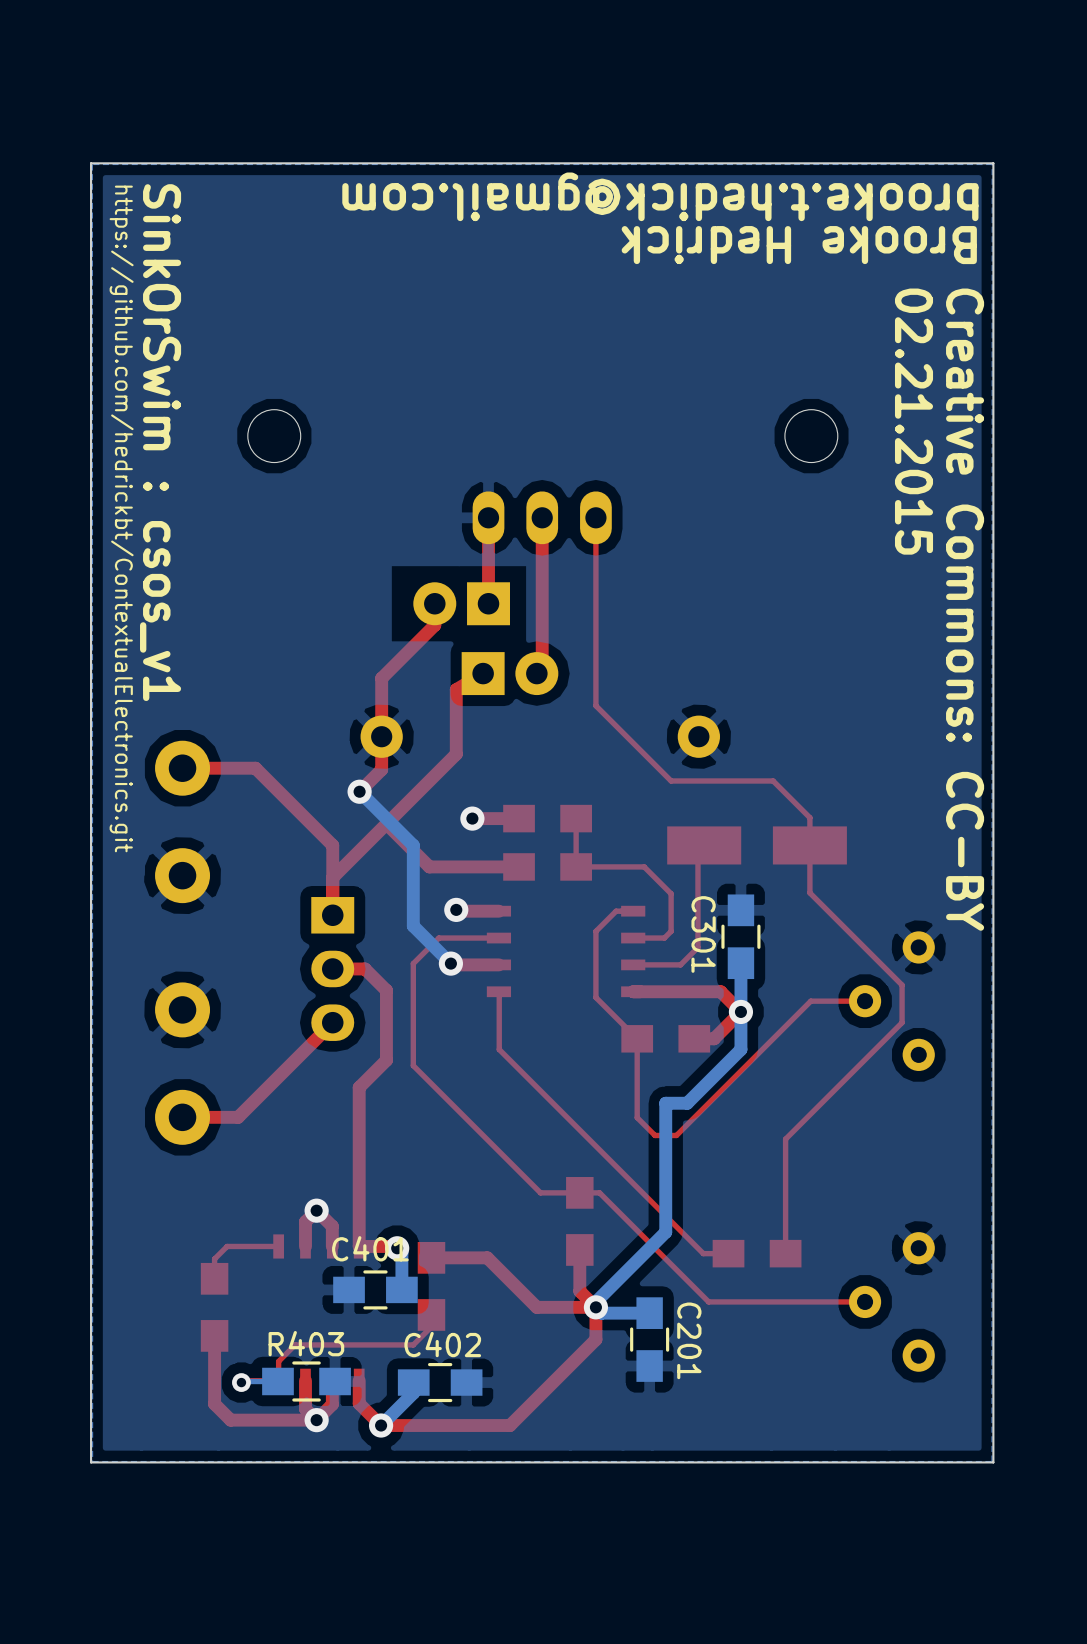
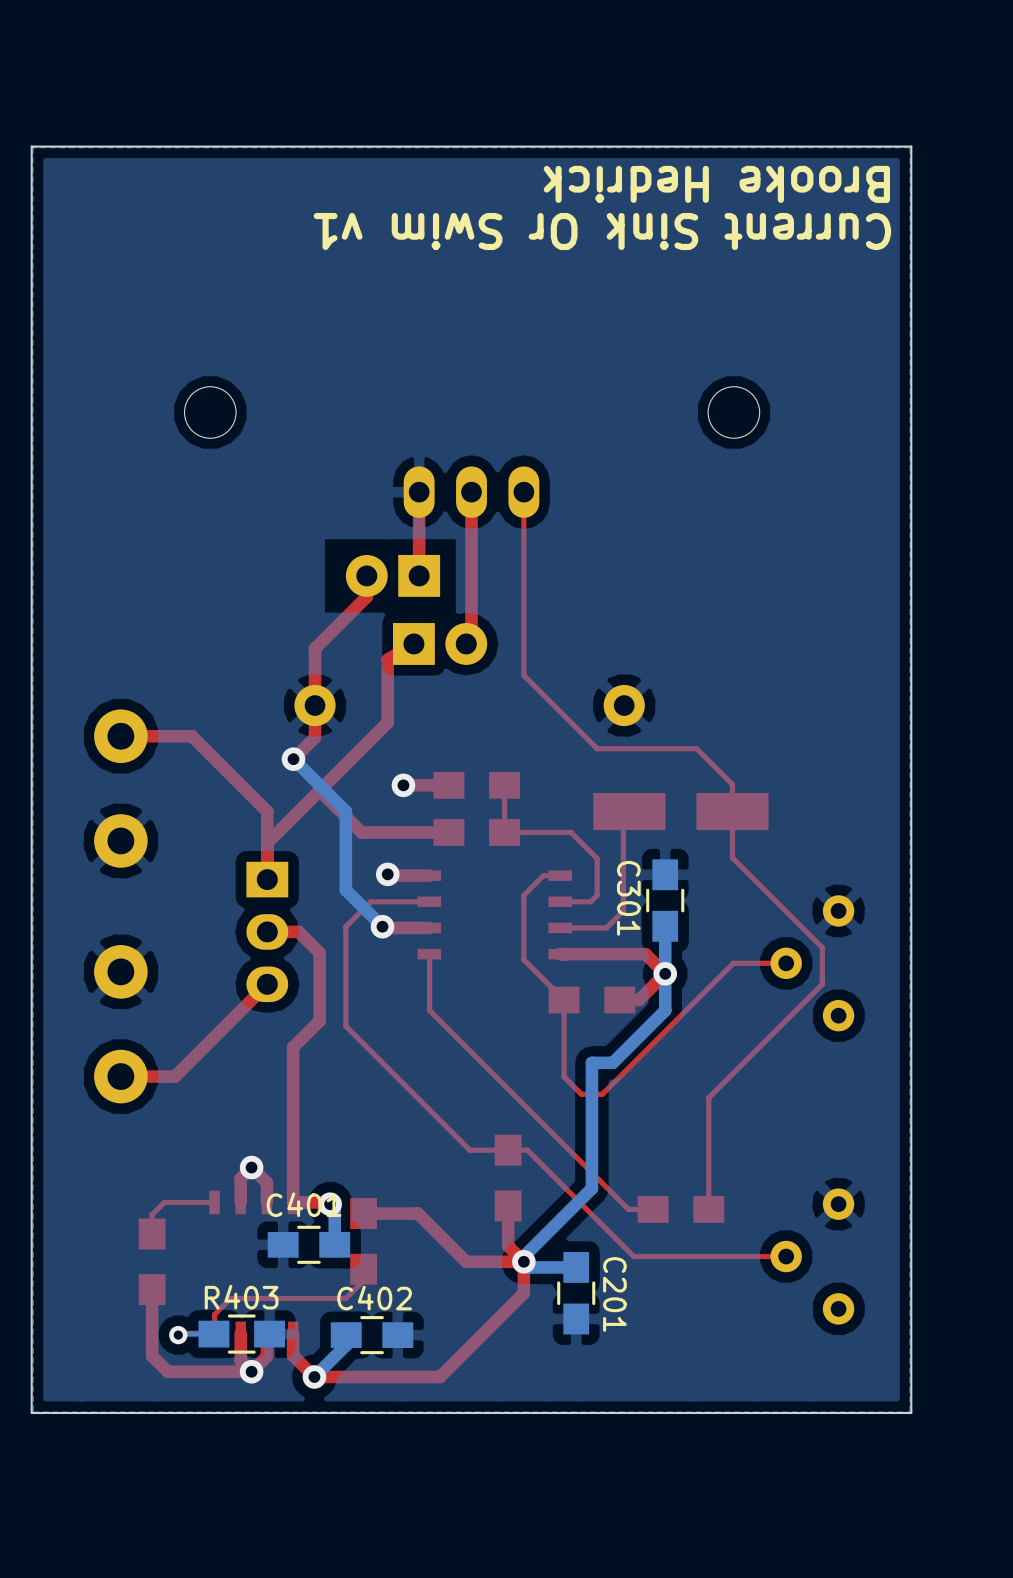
text: brooke.t.hedick@gmail.com (660, 196) -> none
text position: Brooke Hedrick (799, 245) -> Brooke Hedrick (716, 184)
text: none -> Current Sink Or Swim v1 (602, 231)
text: 02.21.2015 (914, 421) -> none
text: SinkOrSwim : csos_v1 (160, 442) -> none
text: https://github.com/hedrickbt/ContextualElectronics.git (121, 518) -> none
text: Creative Commons: CC-BY (965, 609) -> none

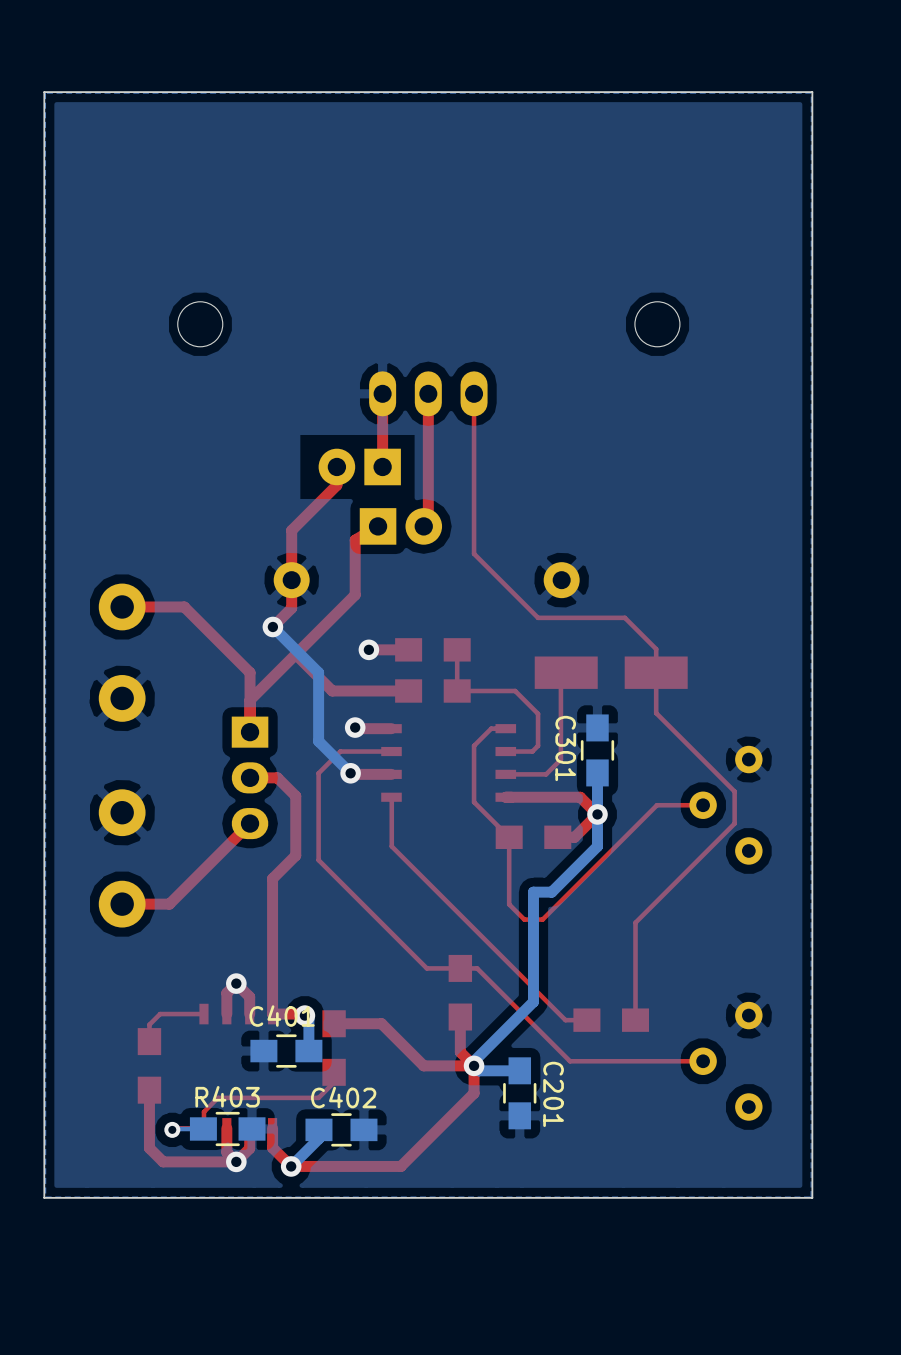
text: Brooke Hedrick (716, 184) -> none
text: Current Sink Or Swim v1 (602, 231) -> none

